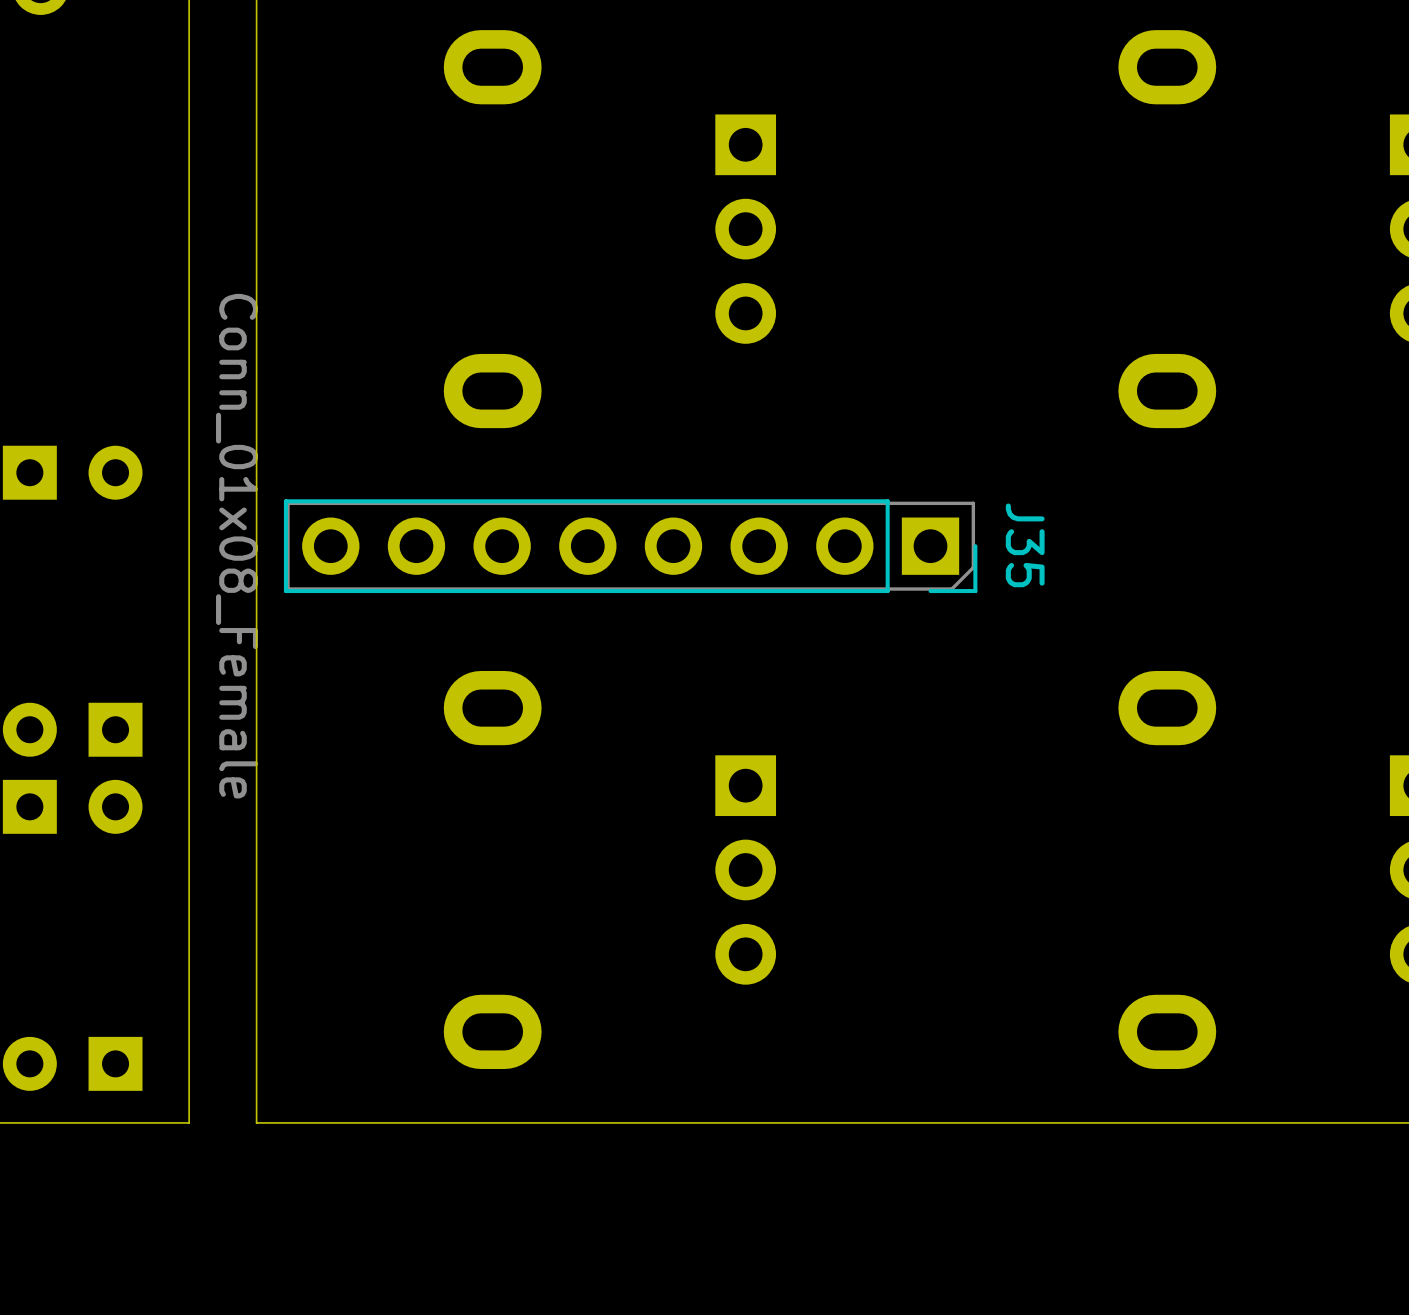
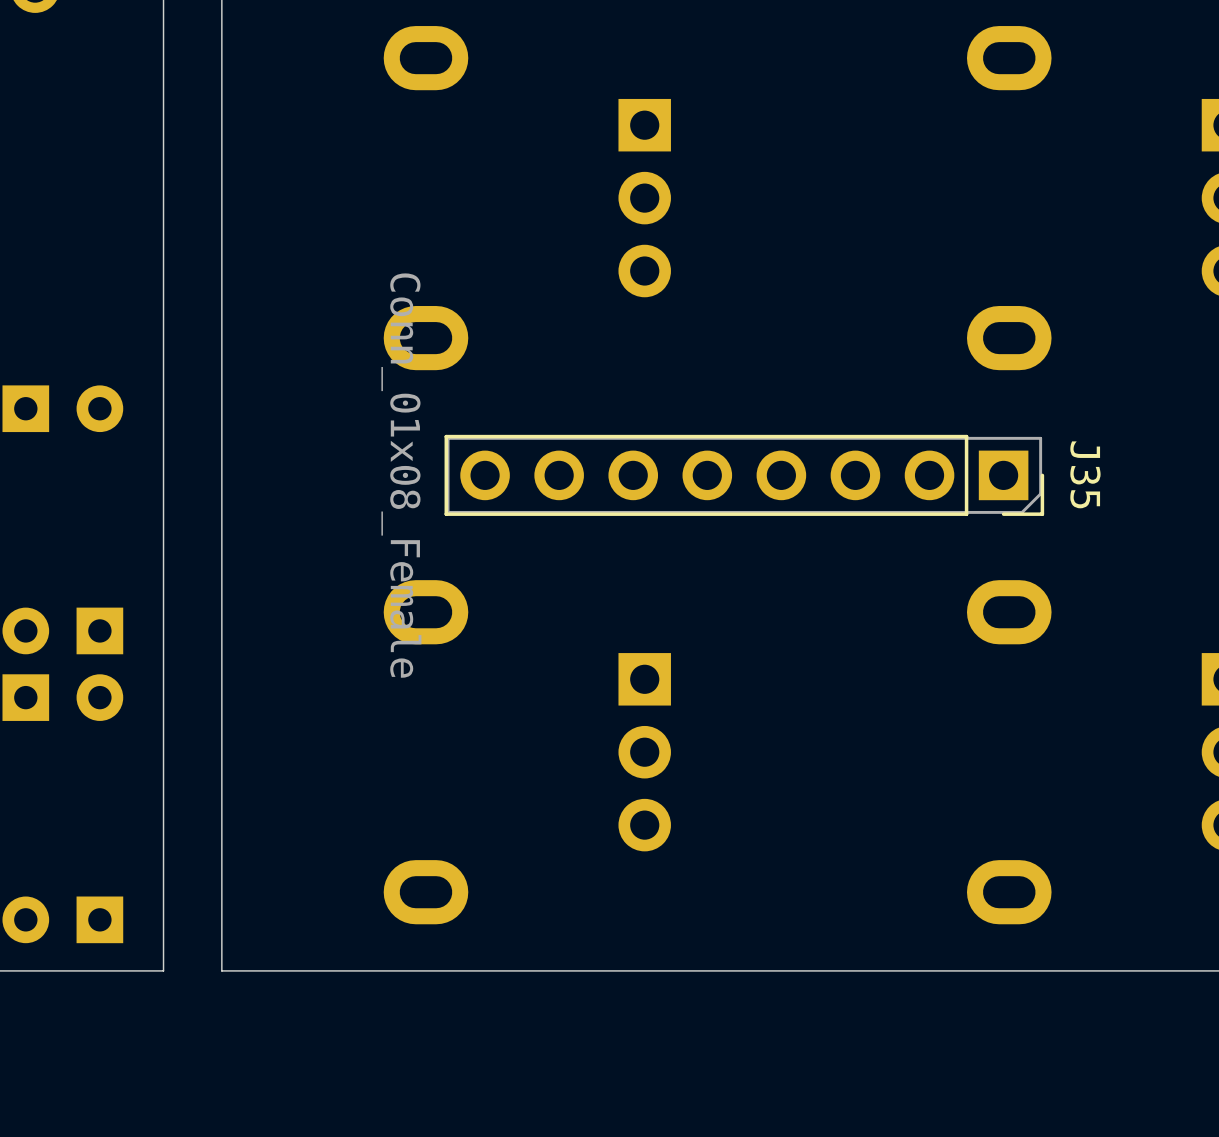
J35 position: (630, 546) -> (744, 475)

